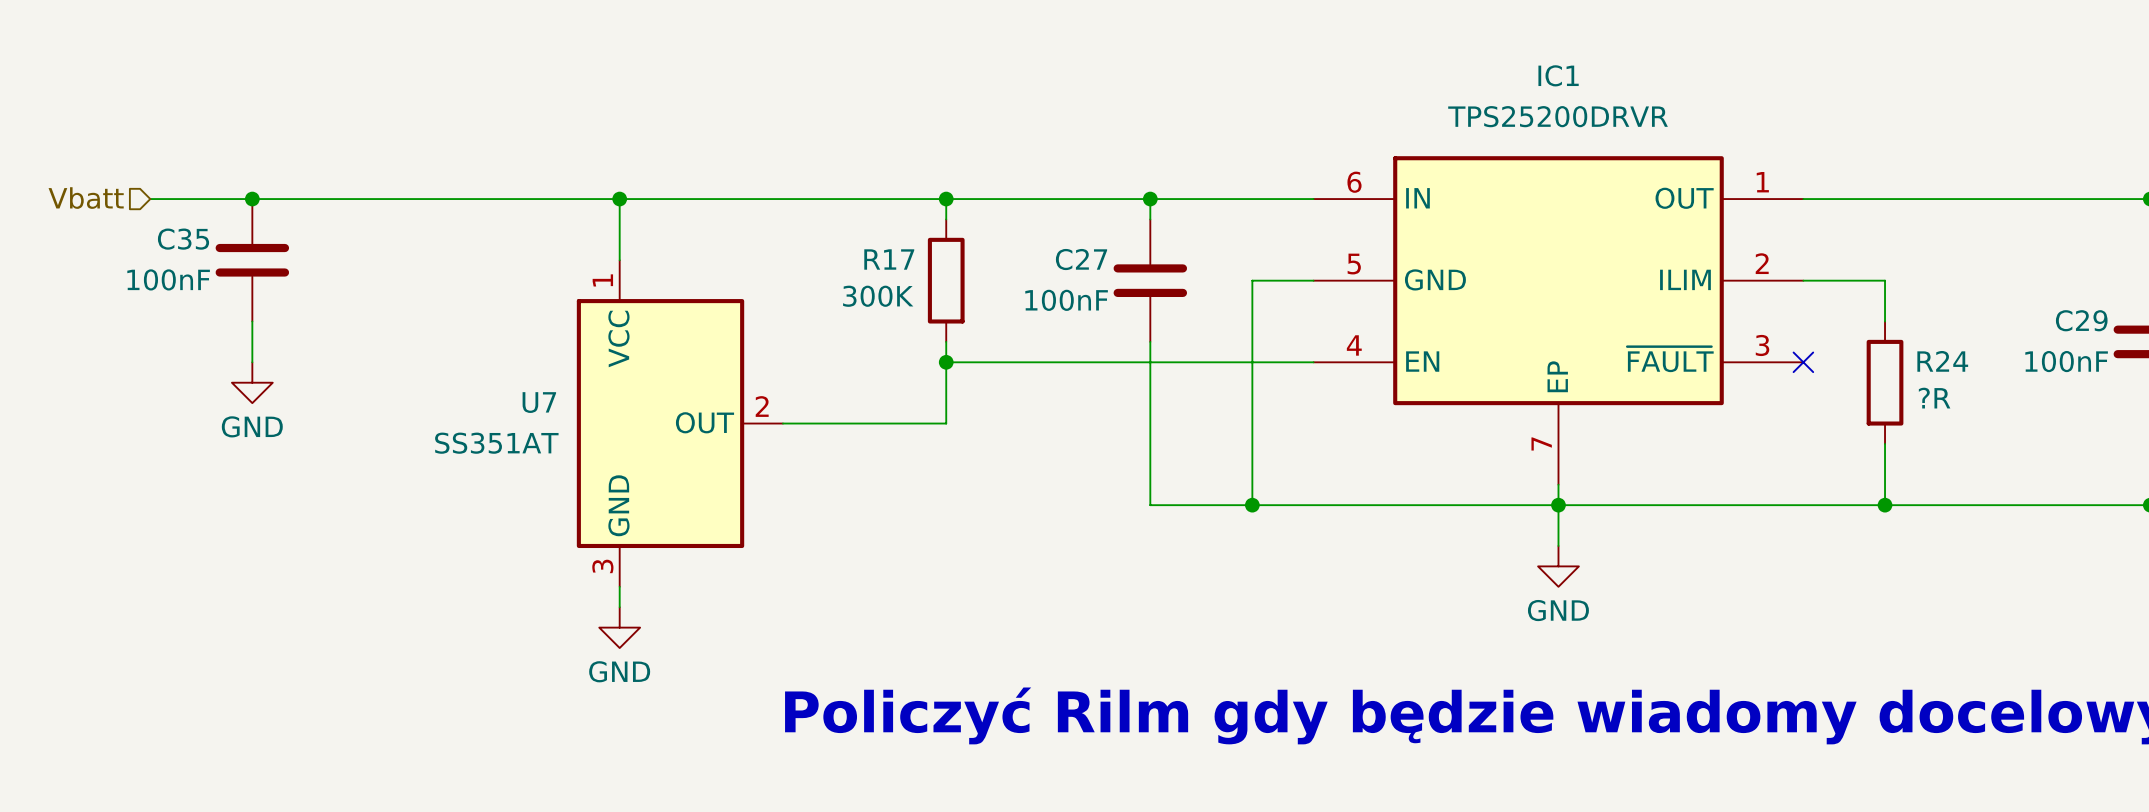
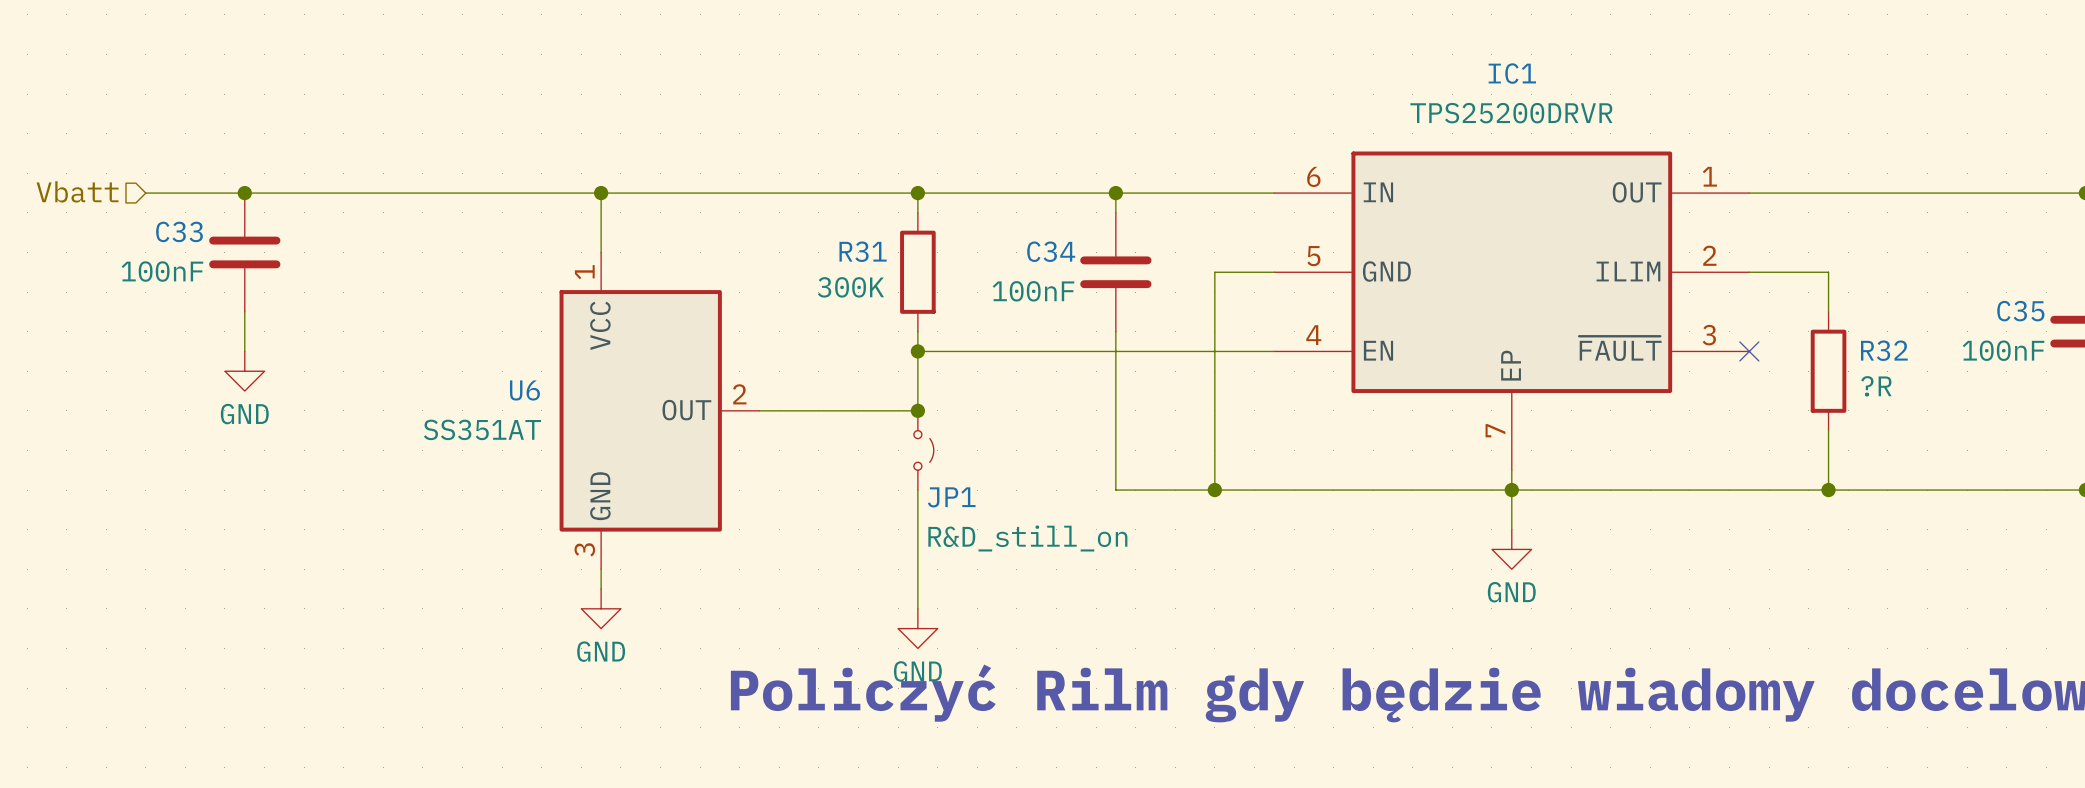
C35 name: C35 (183, 239) -> C33 (179, 231)
R17 name: R17 (889, 259) -> R31 (863, 251)
C27 name: C27 (1081, 259) -> C34 (1051, 251)
C29 name: C29 (2081, 320) -> C35 (2020, 311)
R24 name: R24 (1942, 361) -> R32 (1884, 350)
U7 name: U7 (539, 402) -> U6 (524, 390)
junction: none -> (917, 410)
JP1: none -> R&D_still_on (923, 450)
wire: none -> (917, 490) (917, 608)
power symbol: none -> GND (917, 628)

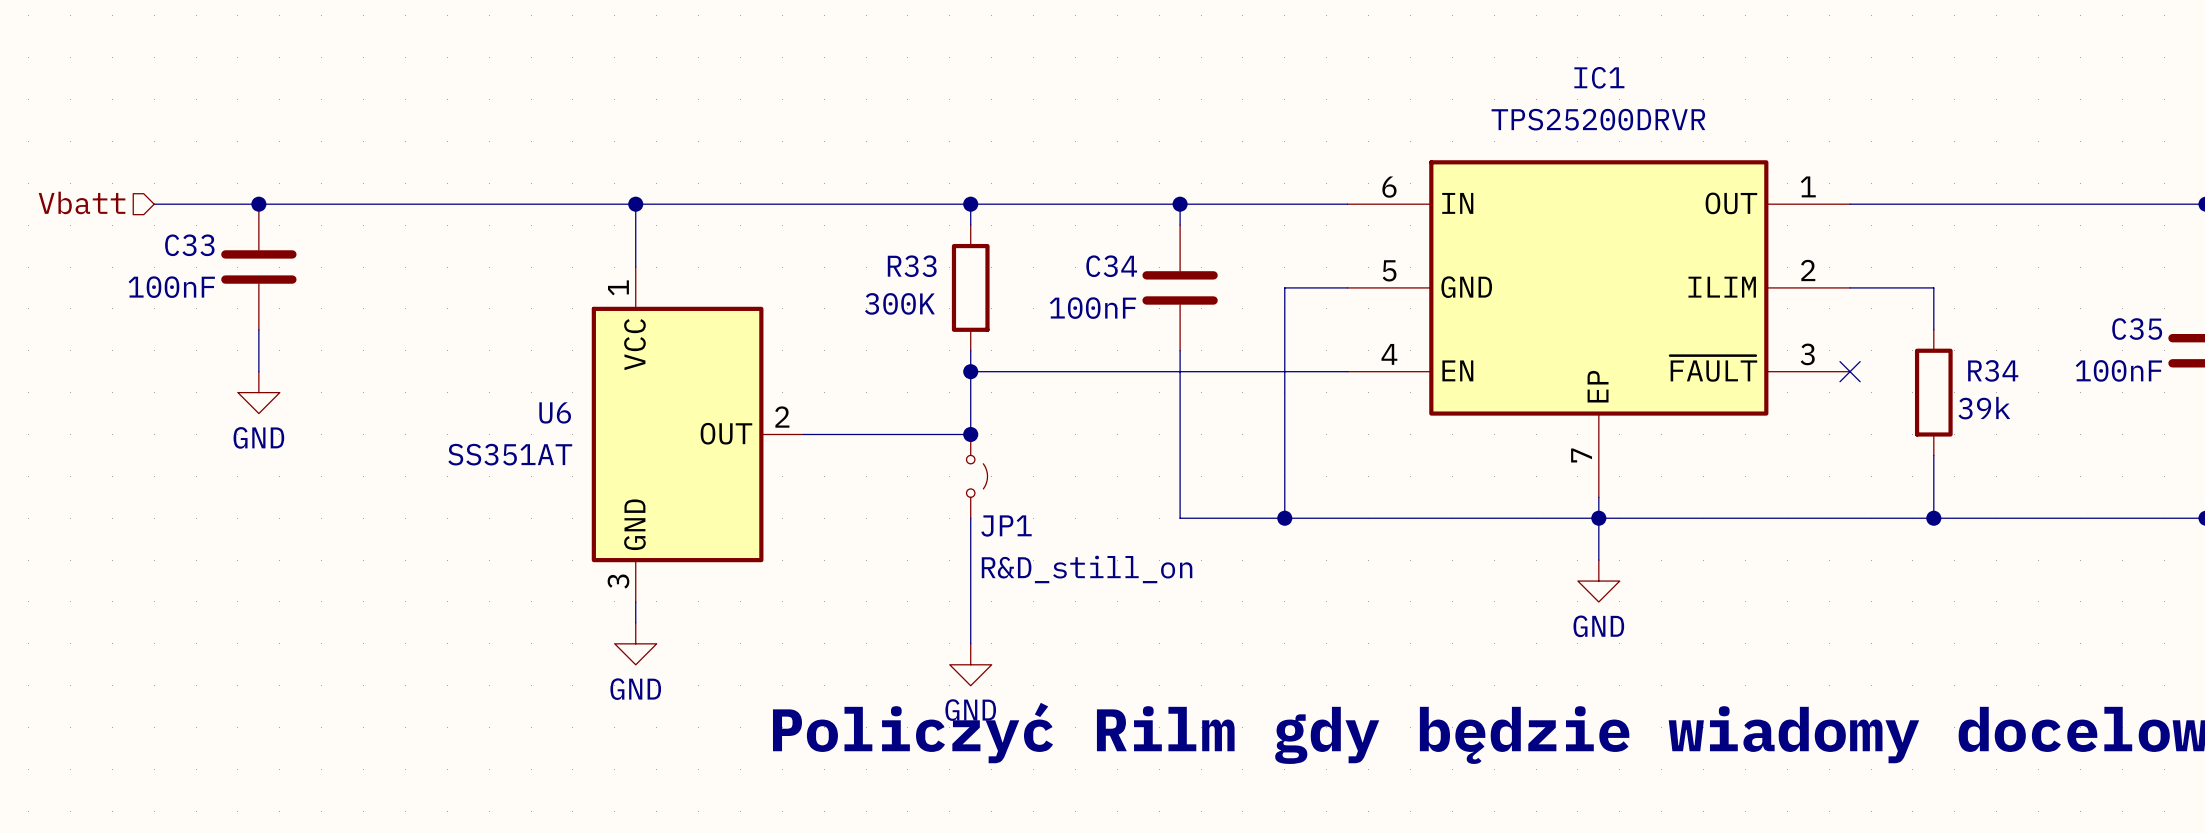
R31 name: R31 (863, 251) -> R33 (912, 266)
R32 name: R32 (1884, 350) -> R34 (1993, 370)
R32 value: ?R (1876, 386) -> 39k (1984, 408)

